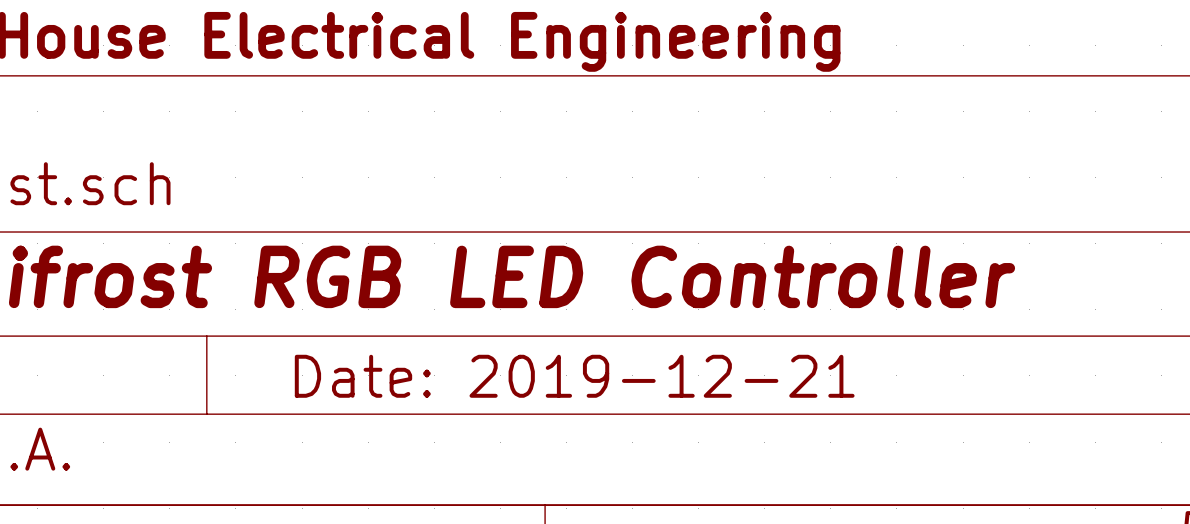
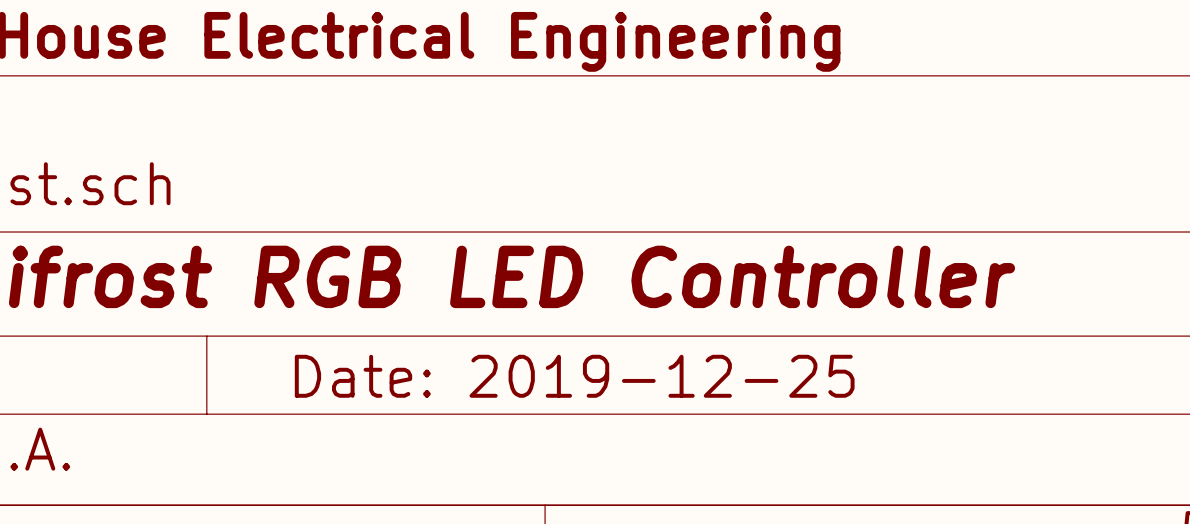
title block: Date: 2019-12-21 (574, 376) -> Date: 2019-12-25 (574, 376)

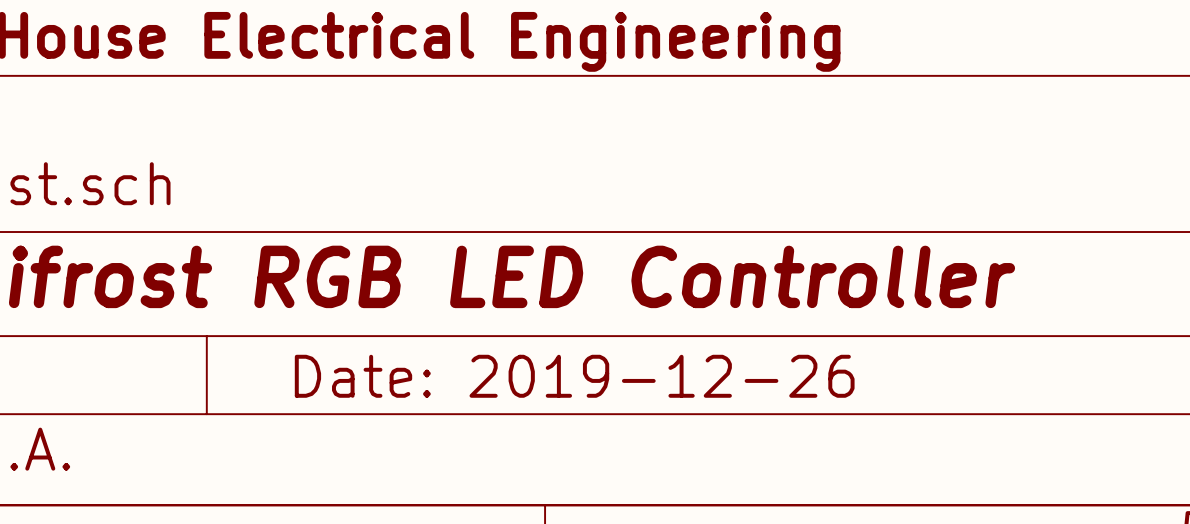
title block: Date: 2019-12-25 (574, 376) -> Date: 2019-12-26 (574, 376)

